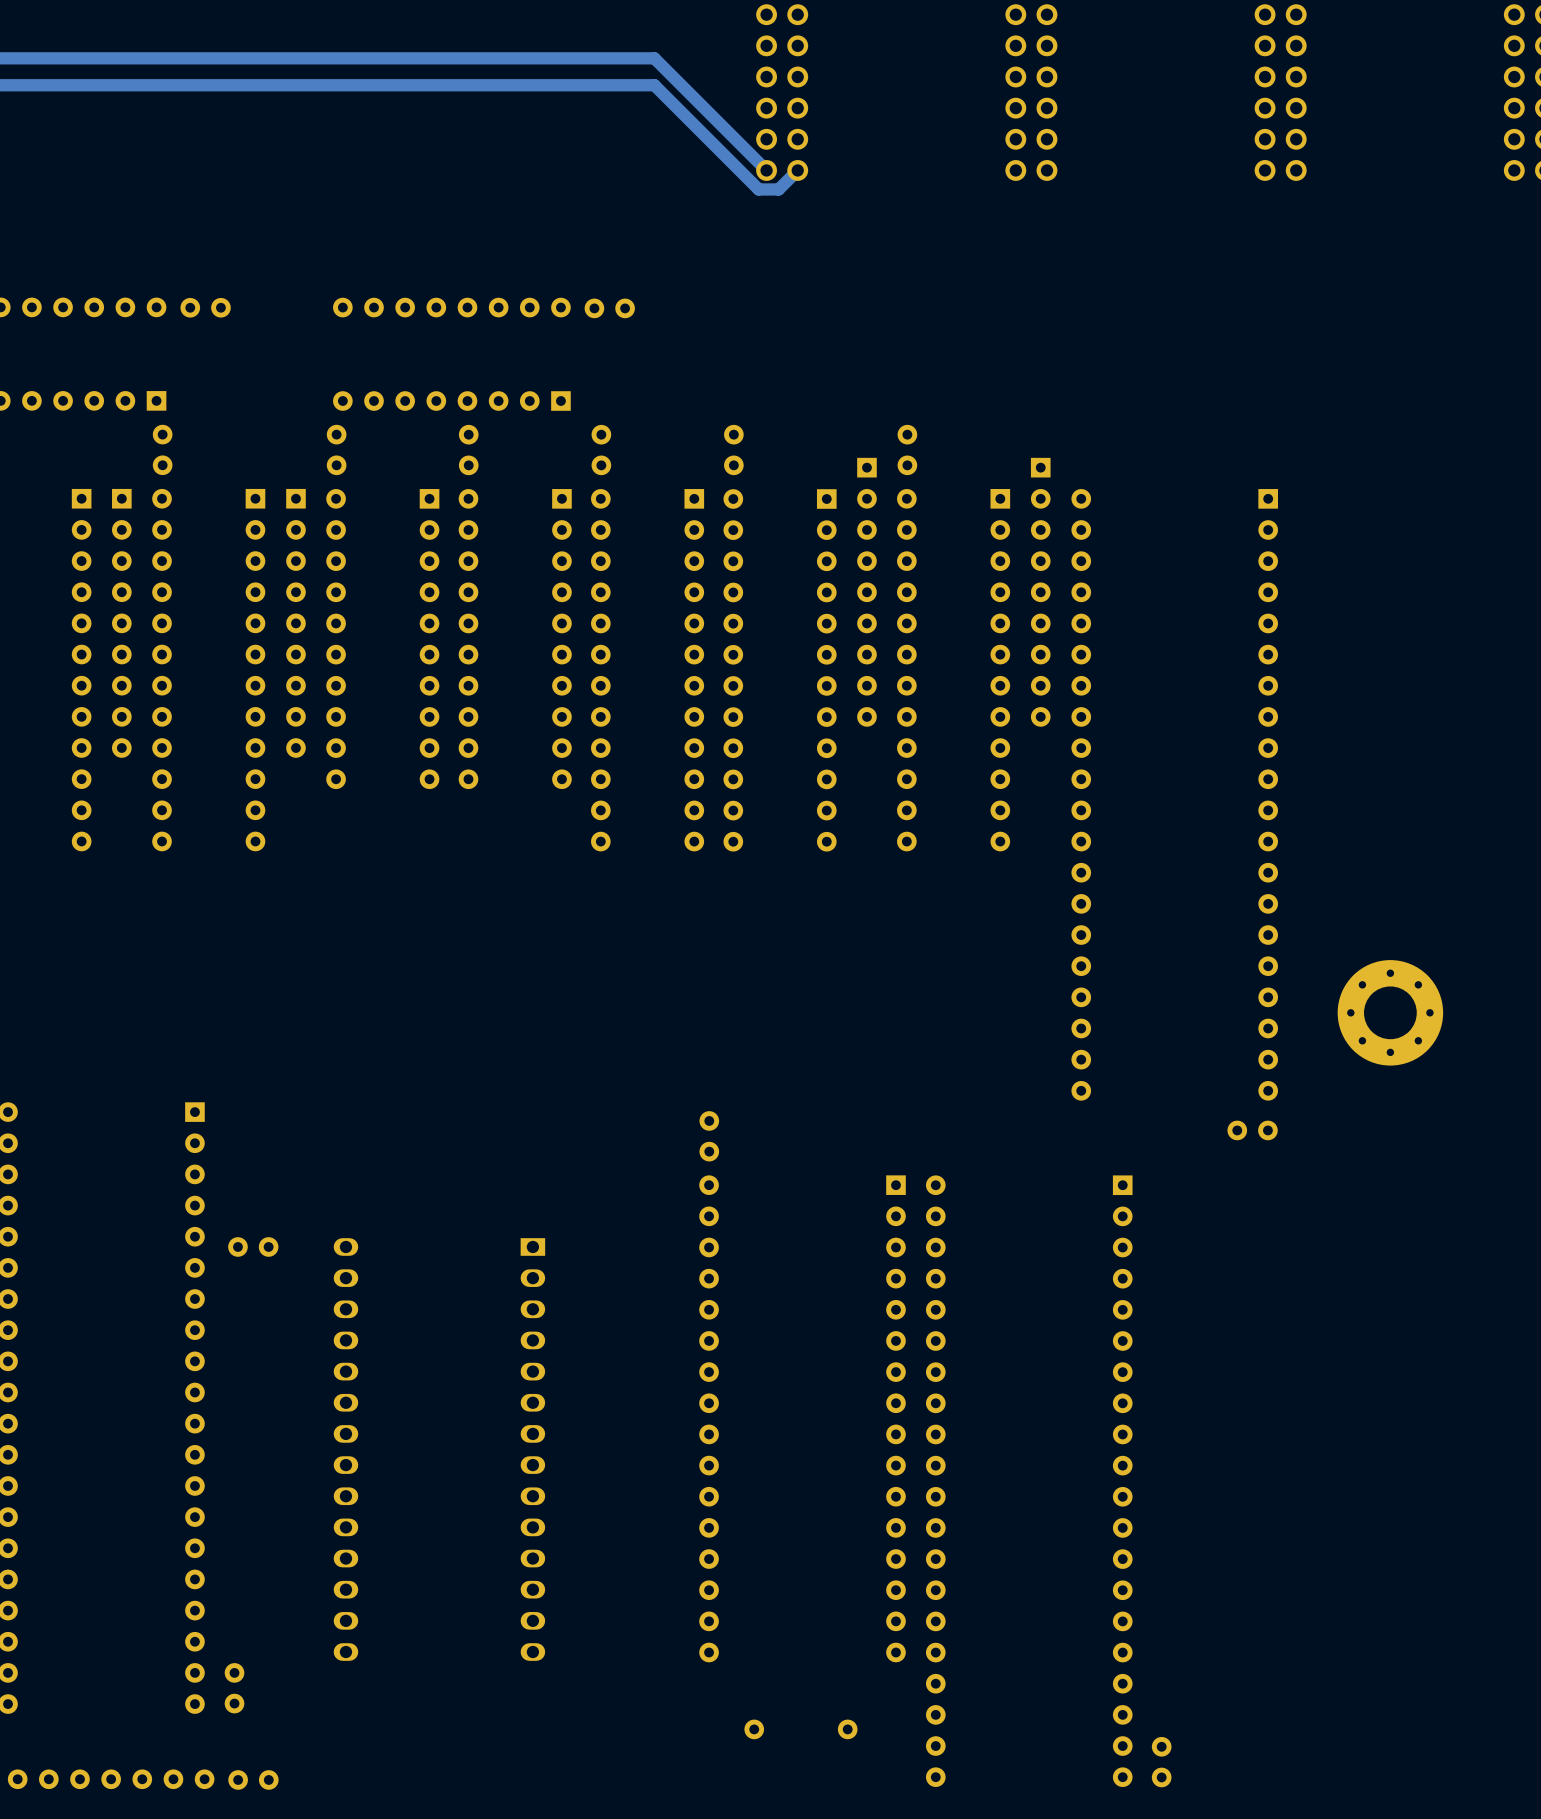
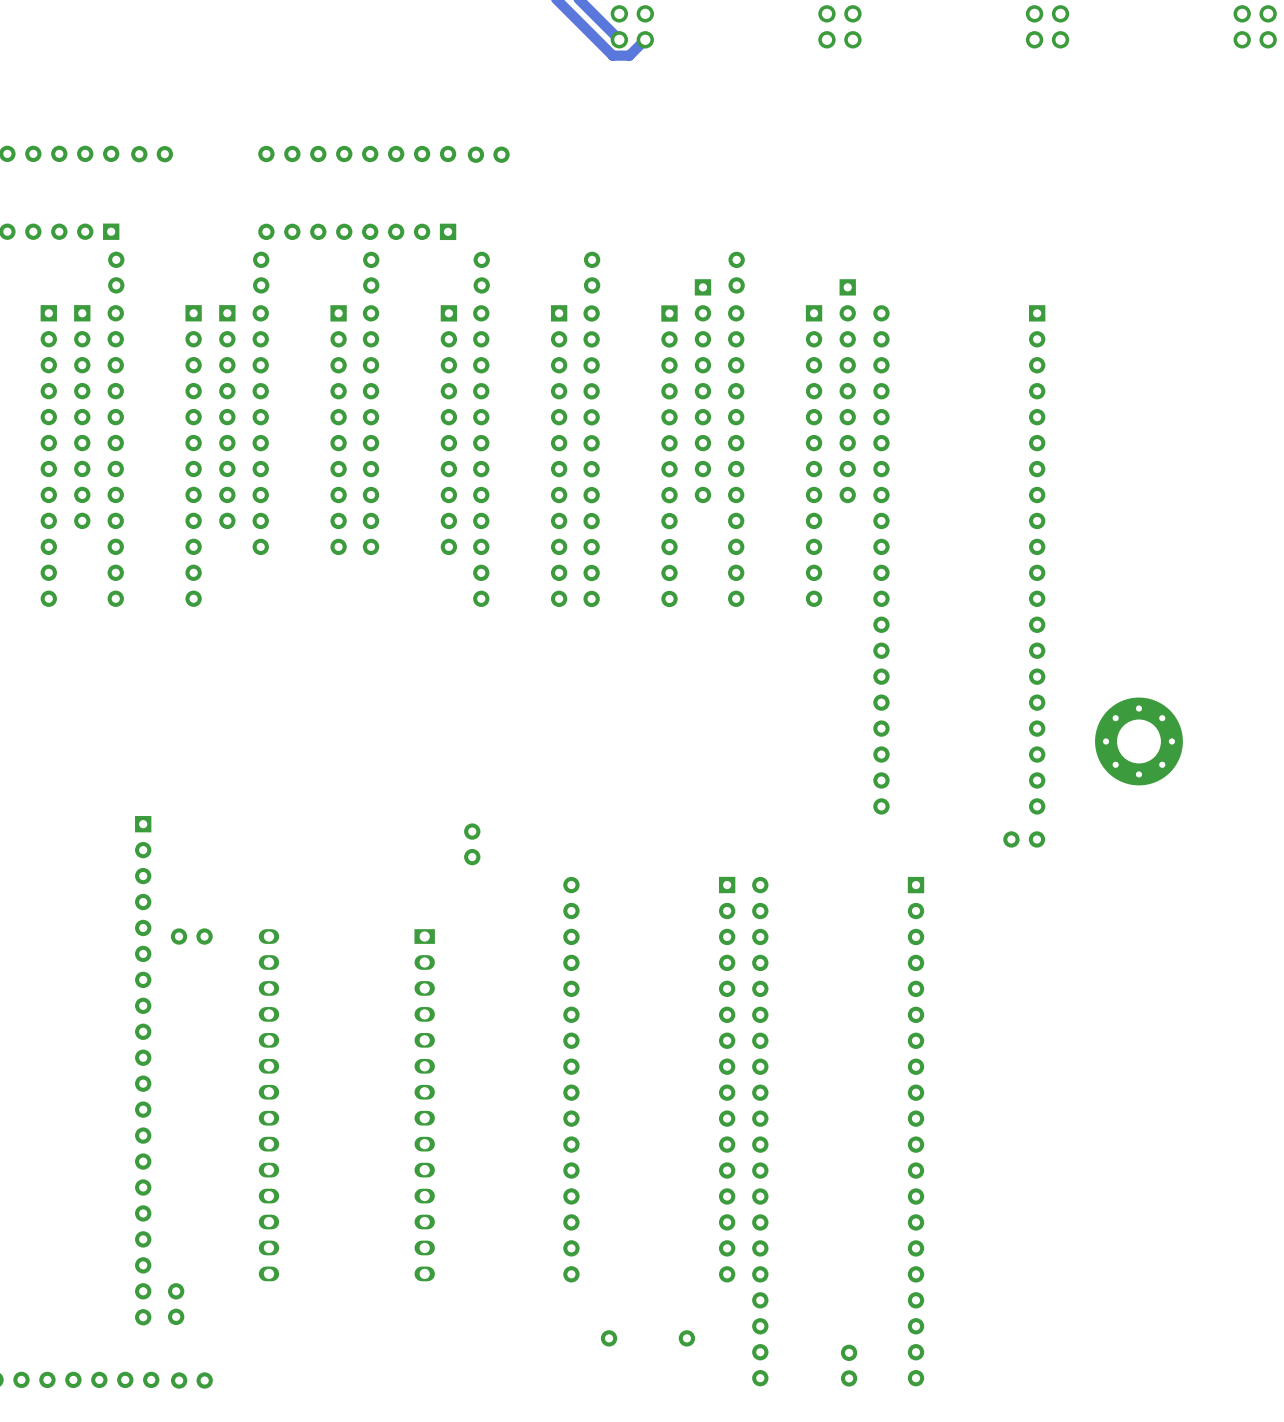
part position: (709, 1136) -> (472, 844)
part position: (1161, 1762) -> (849, 1365)

